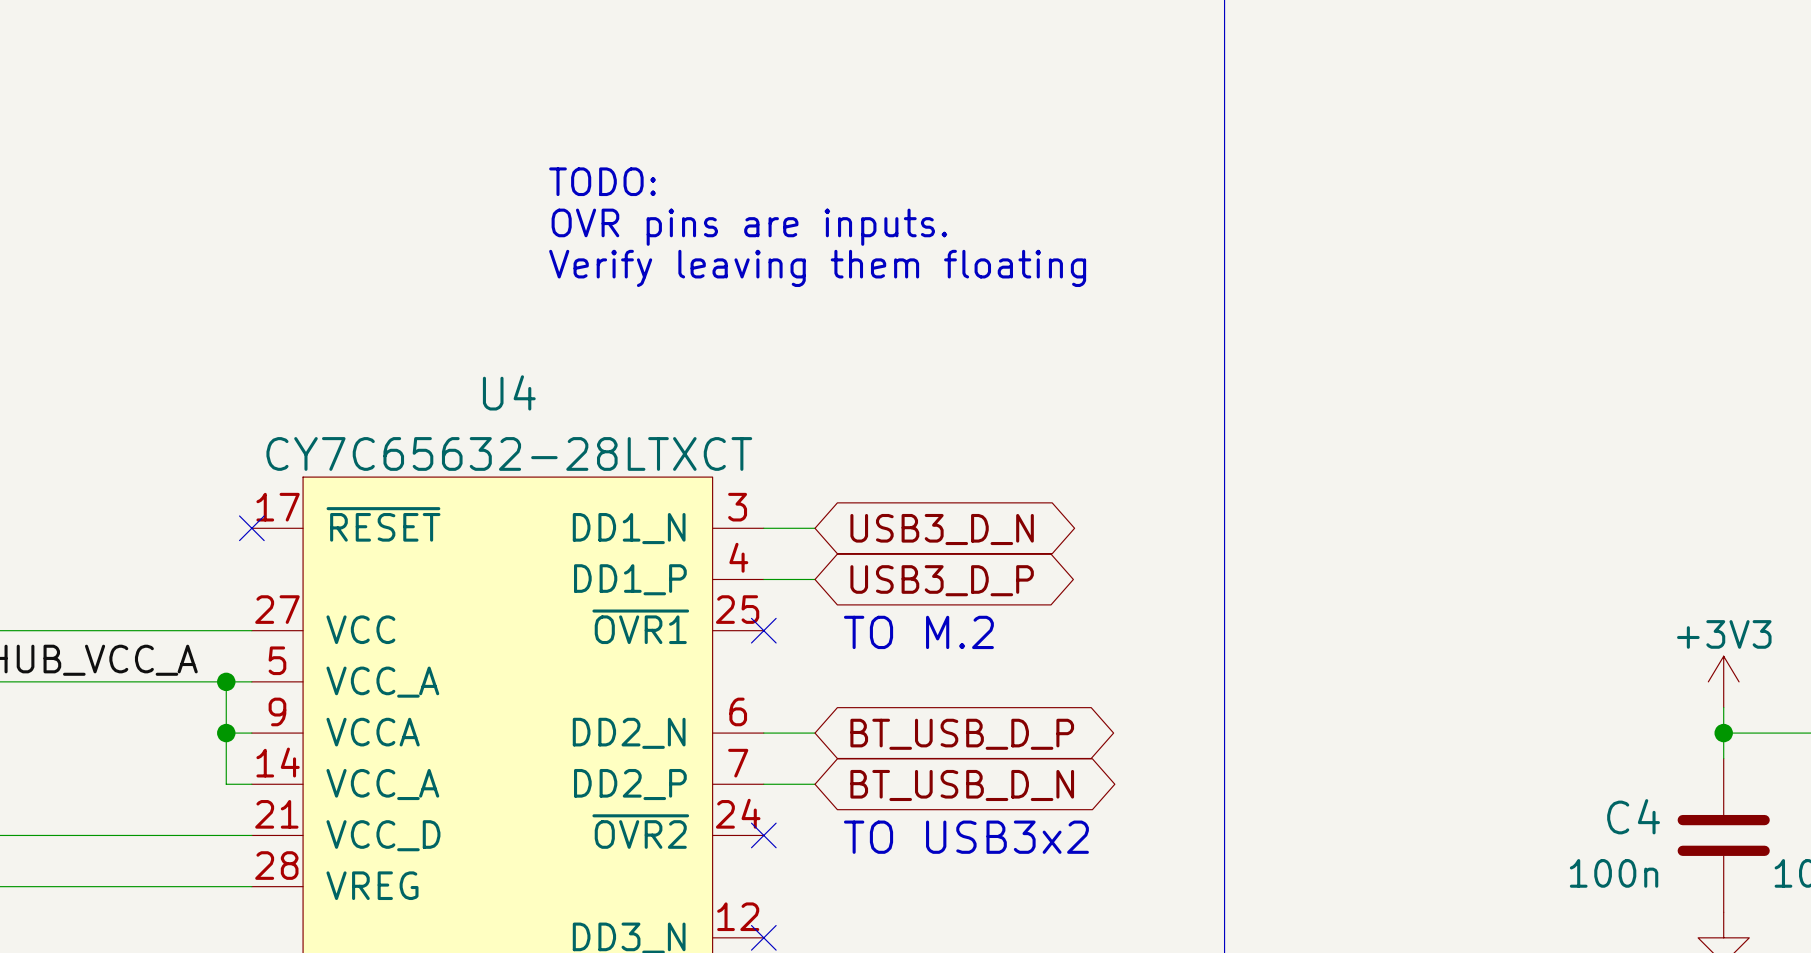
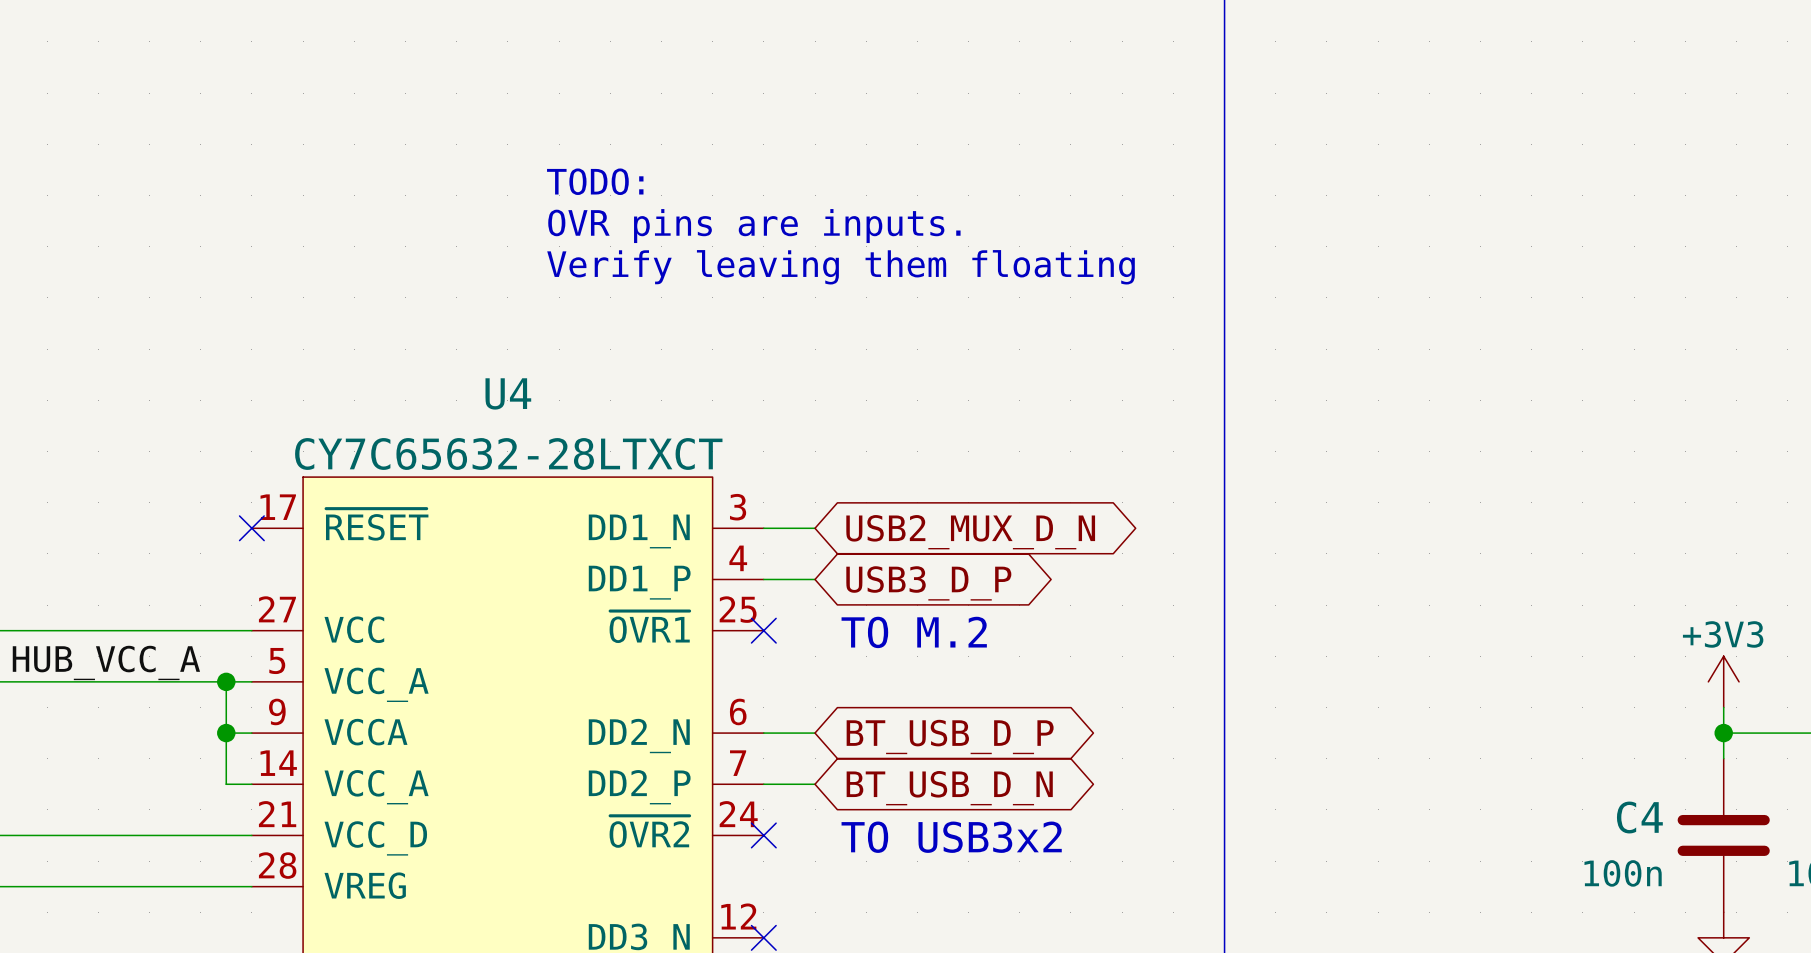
global label: USB3_D_N (942, 529) -> USB2_MUX_D_N (970, 532)

